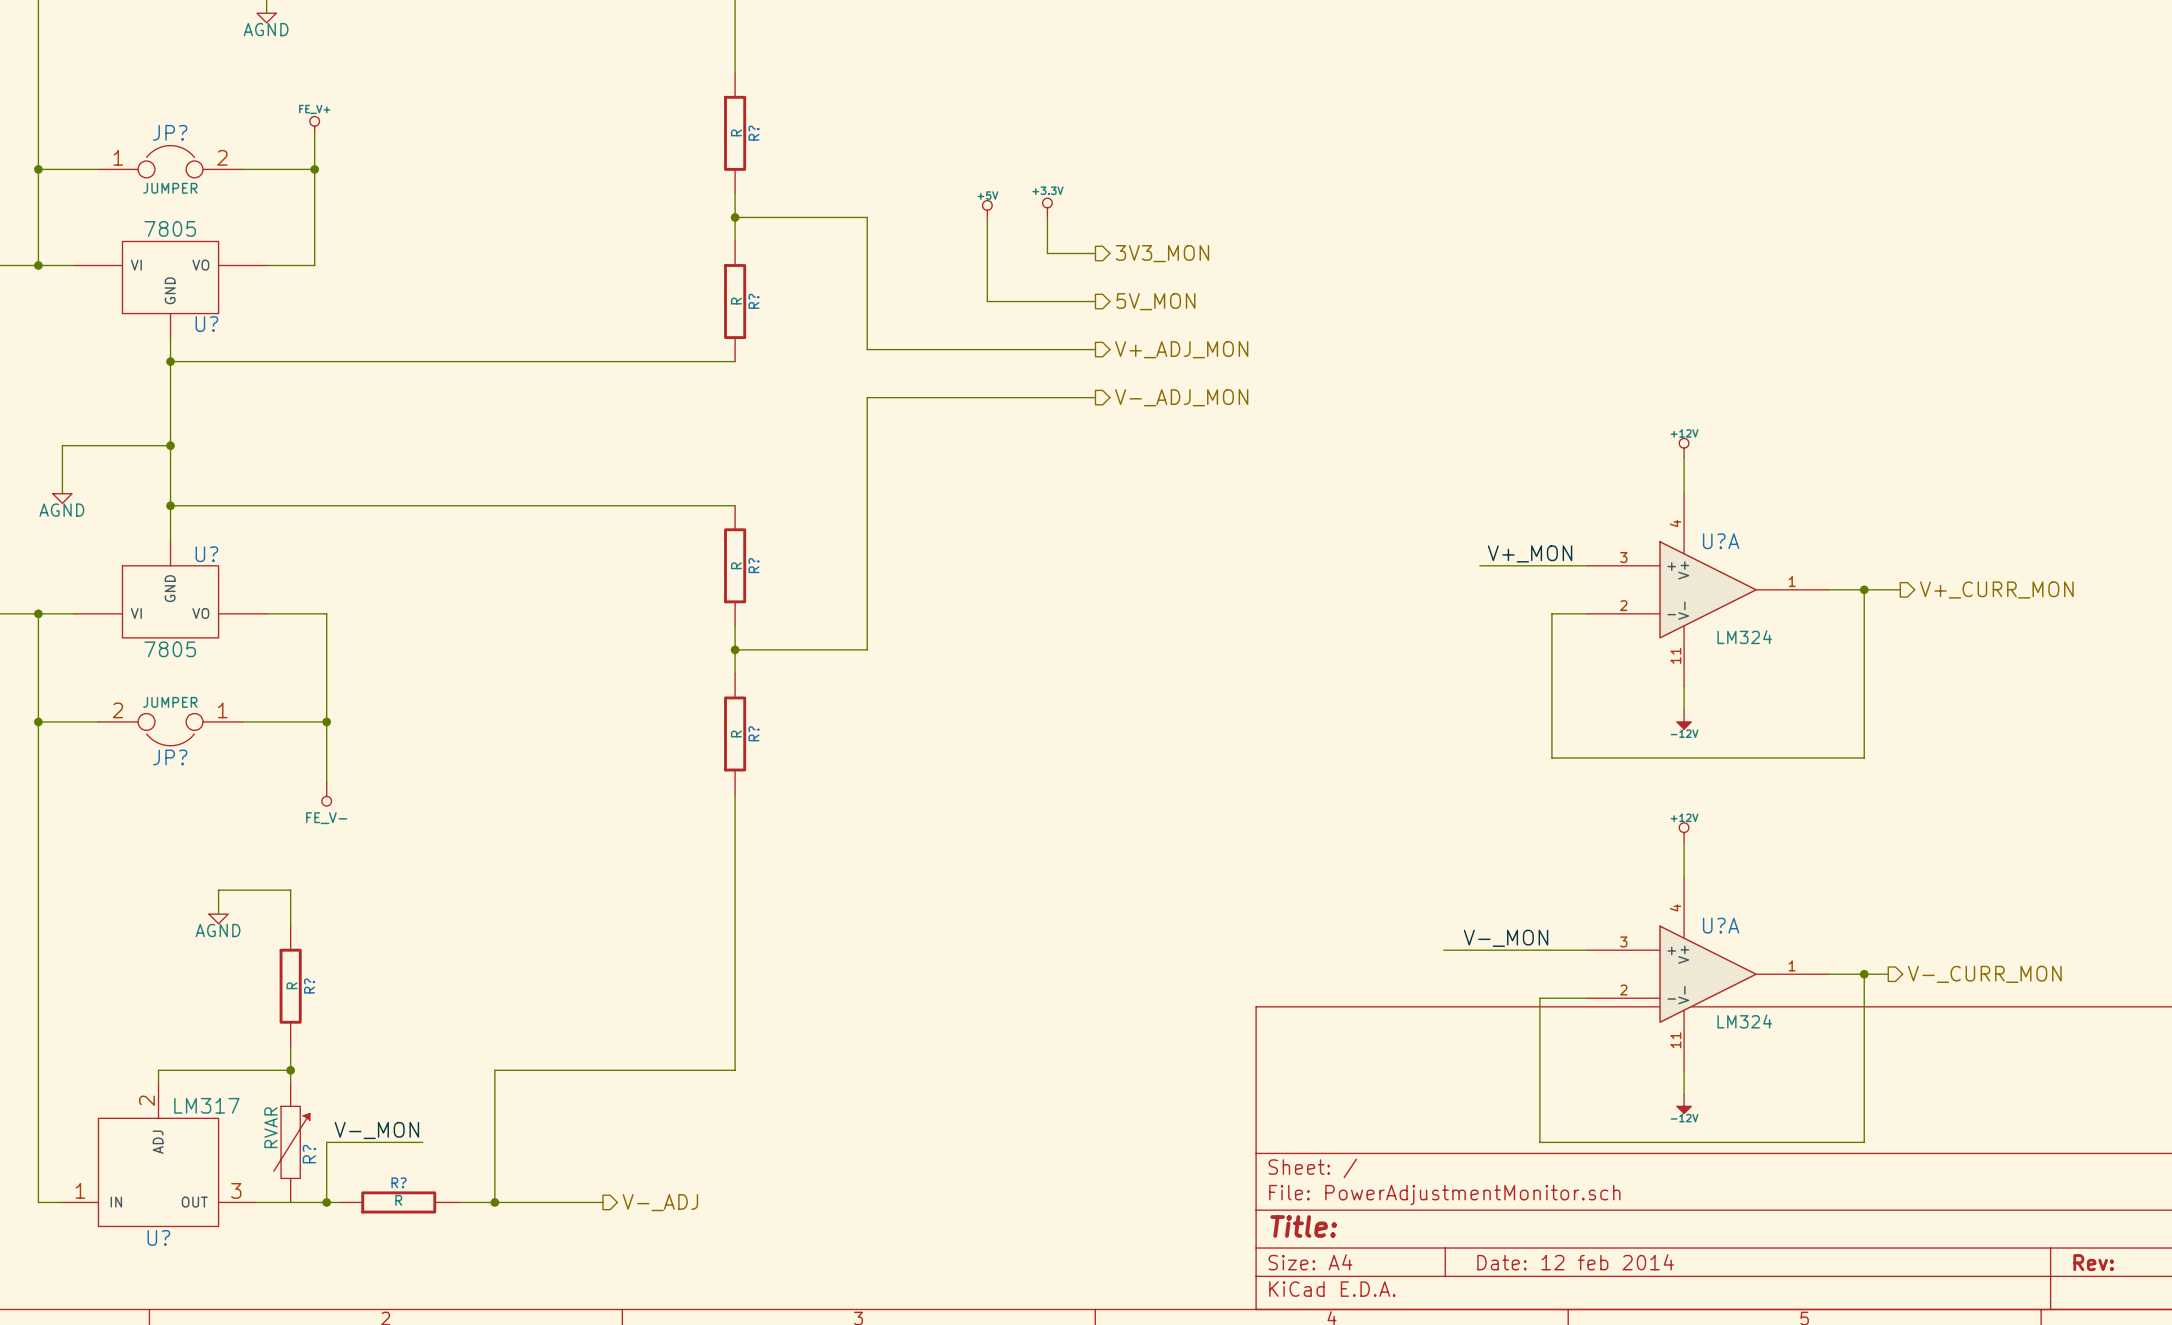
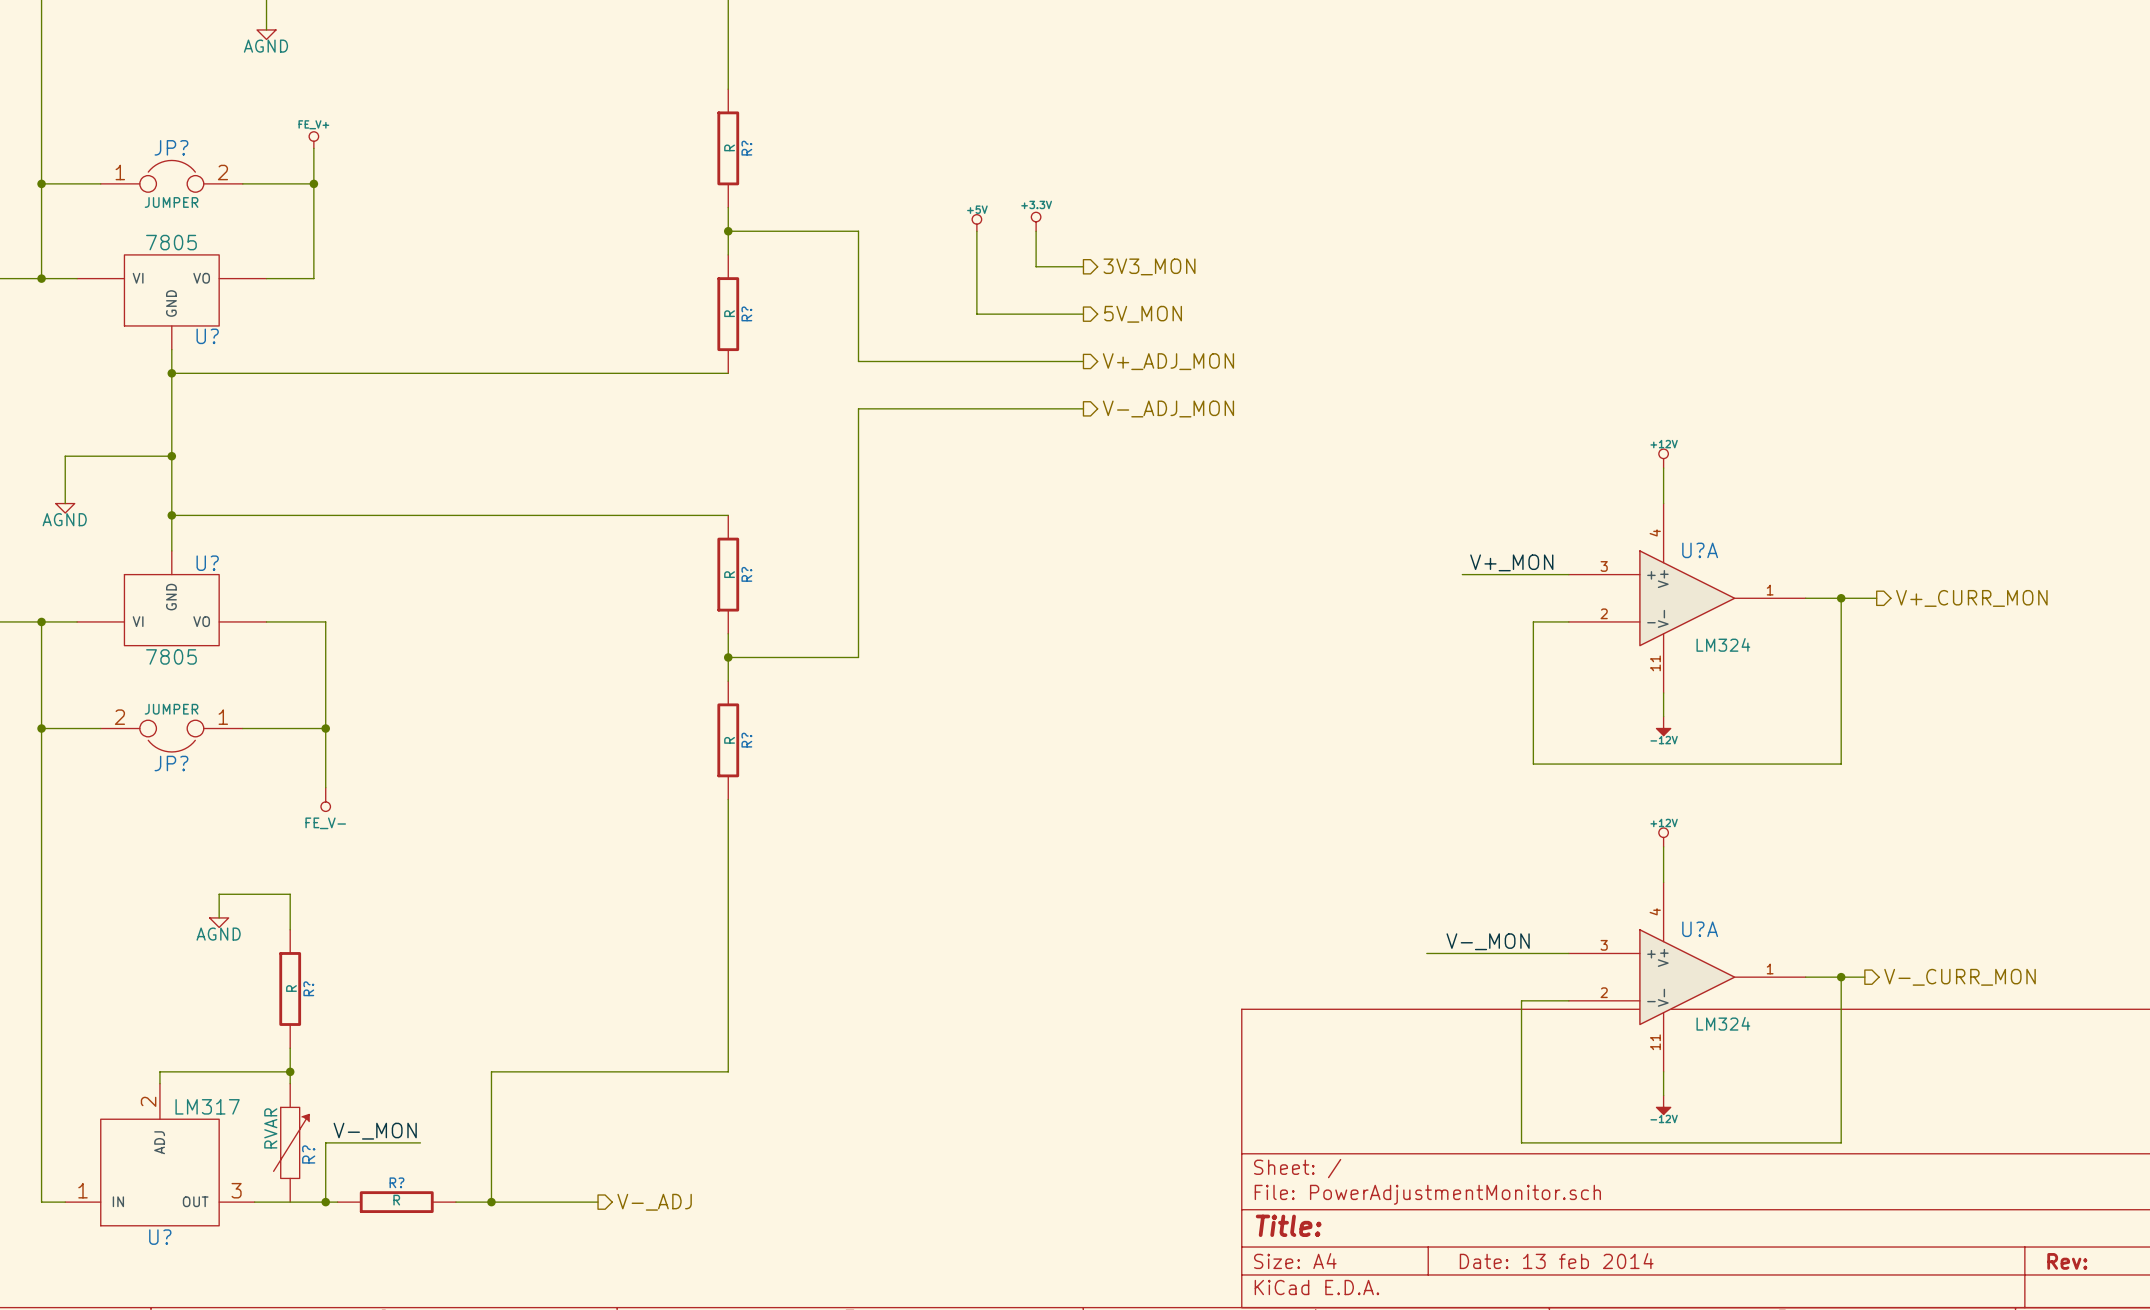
title block: Date: 12 feb 2014 (1575, 1262) -> Date: 13 feb 2014 (1556, 1261)

